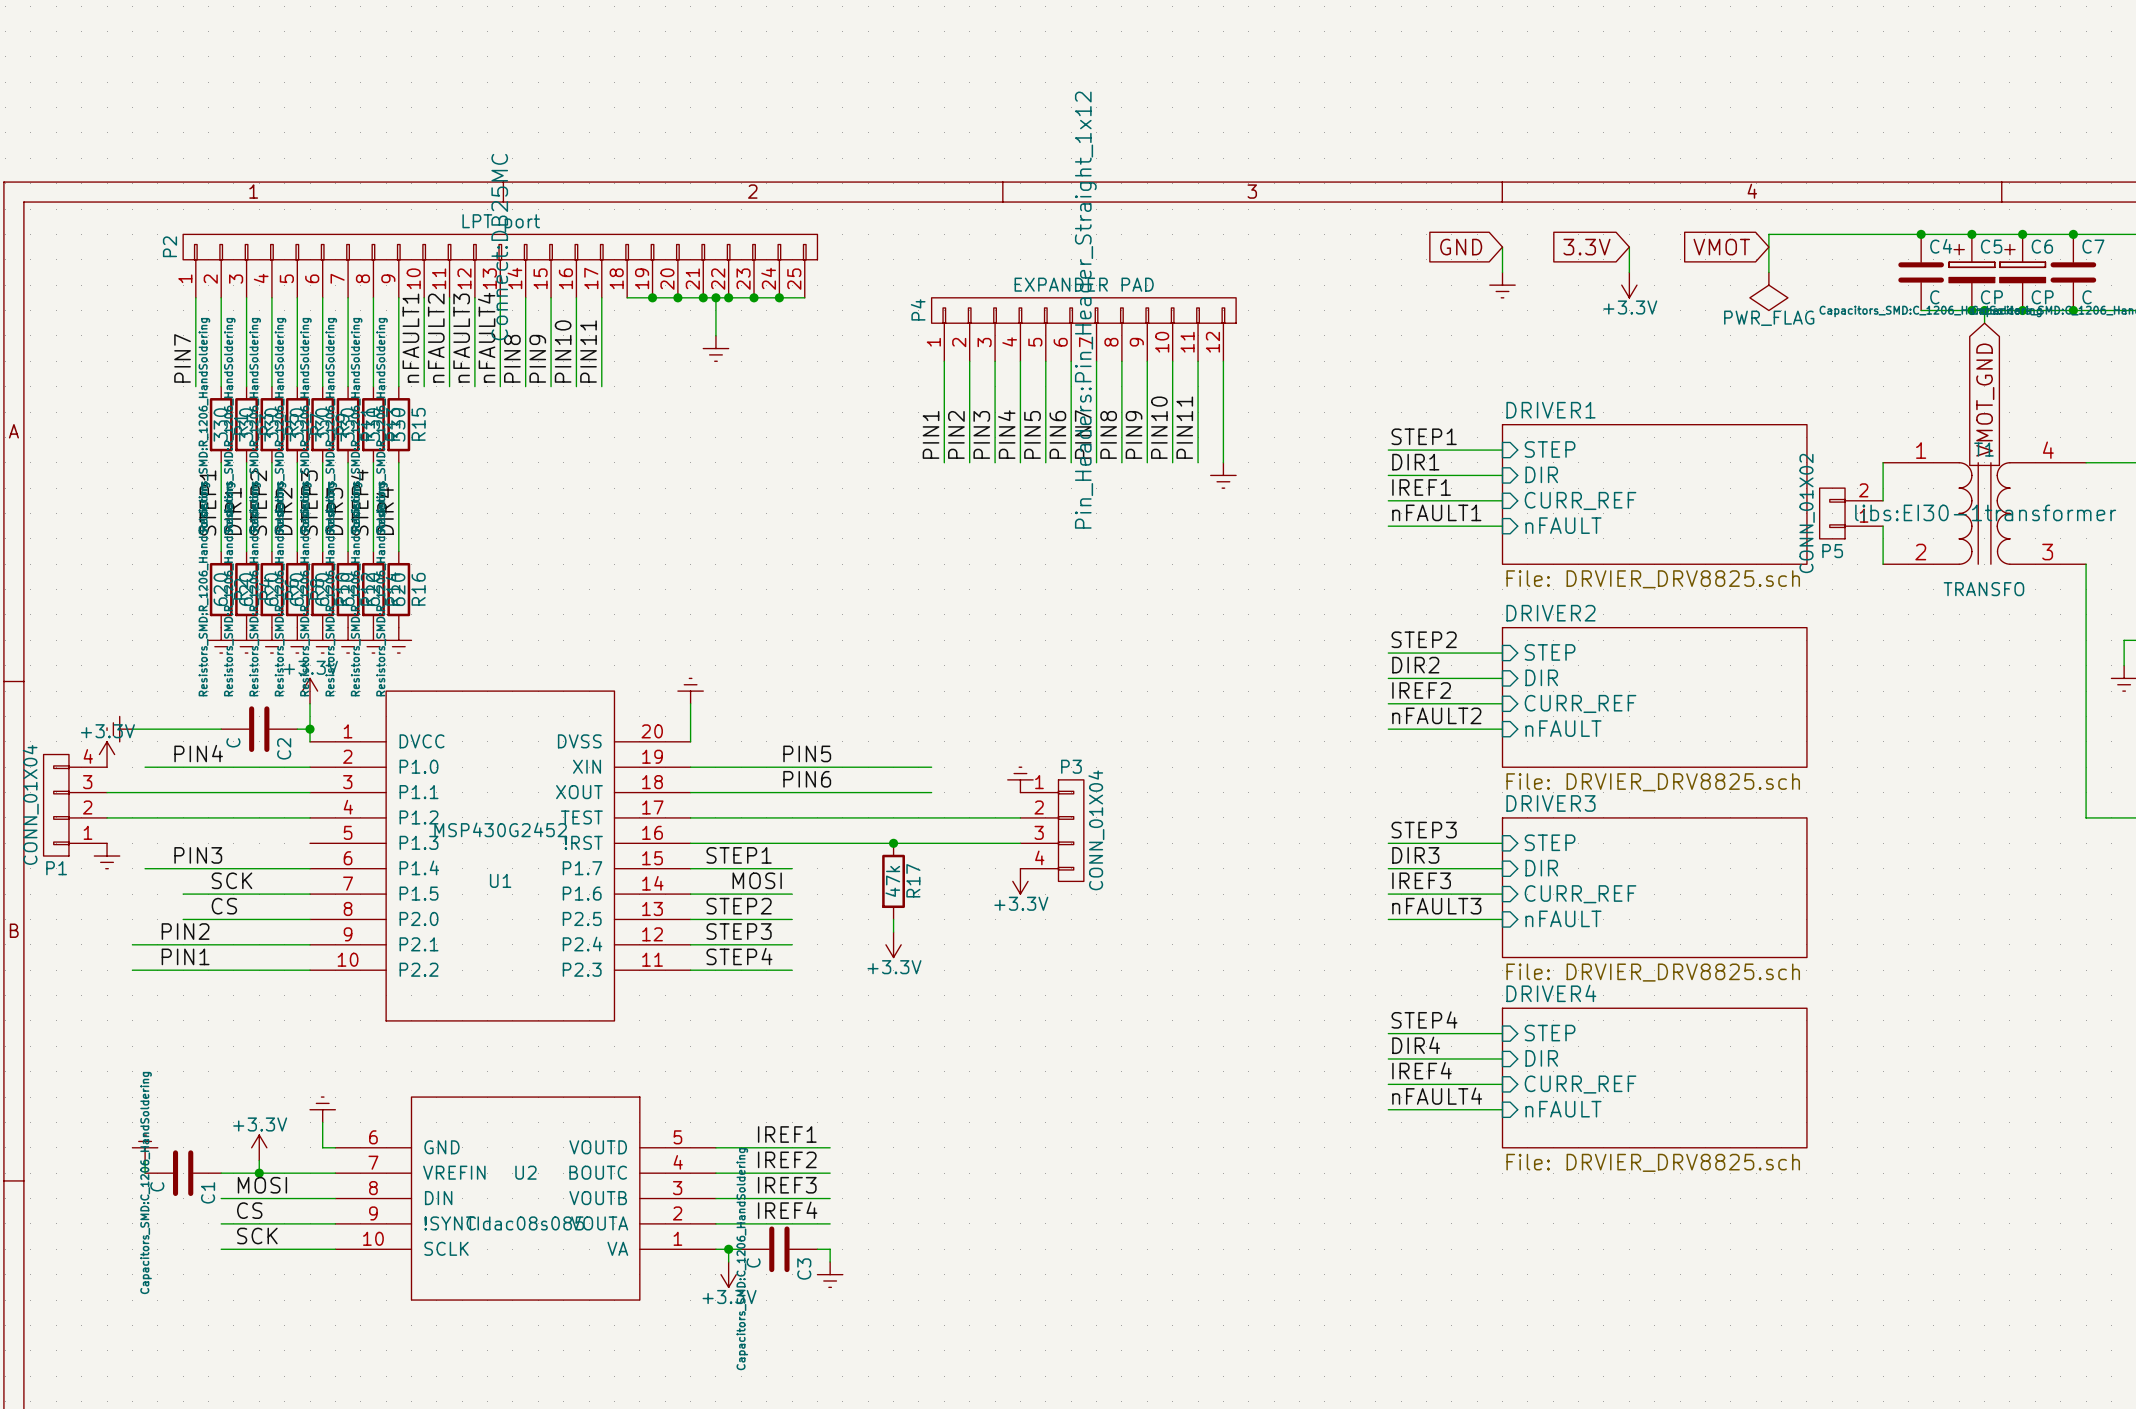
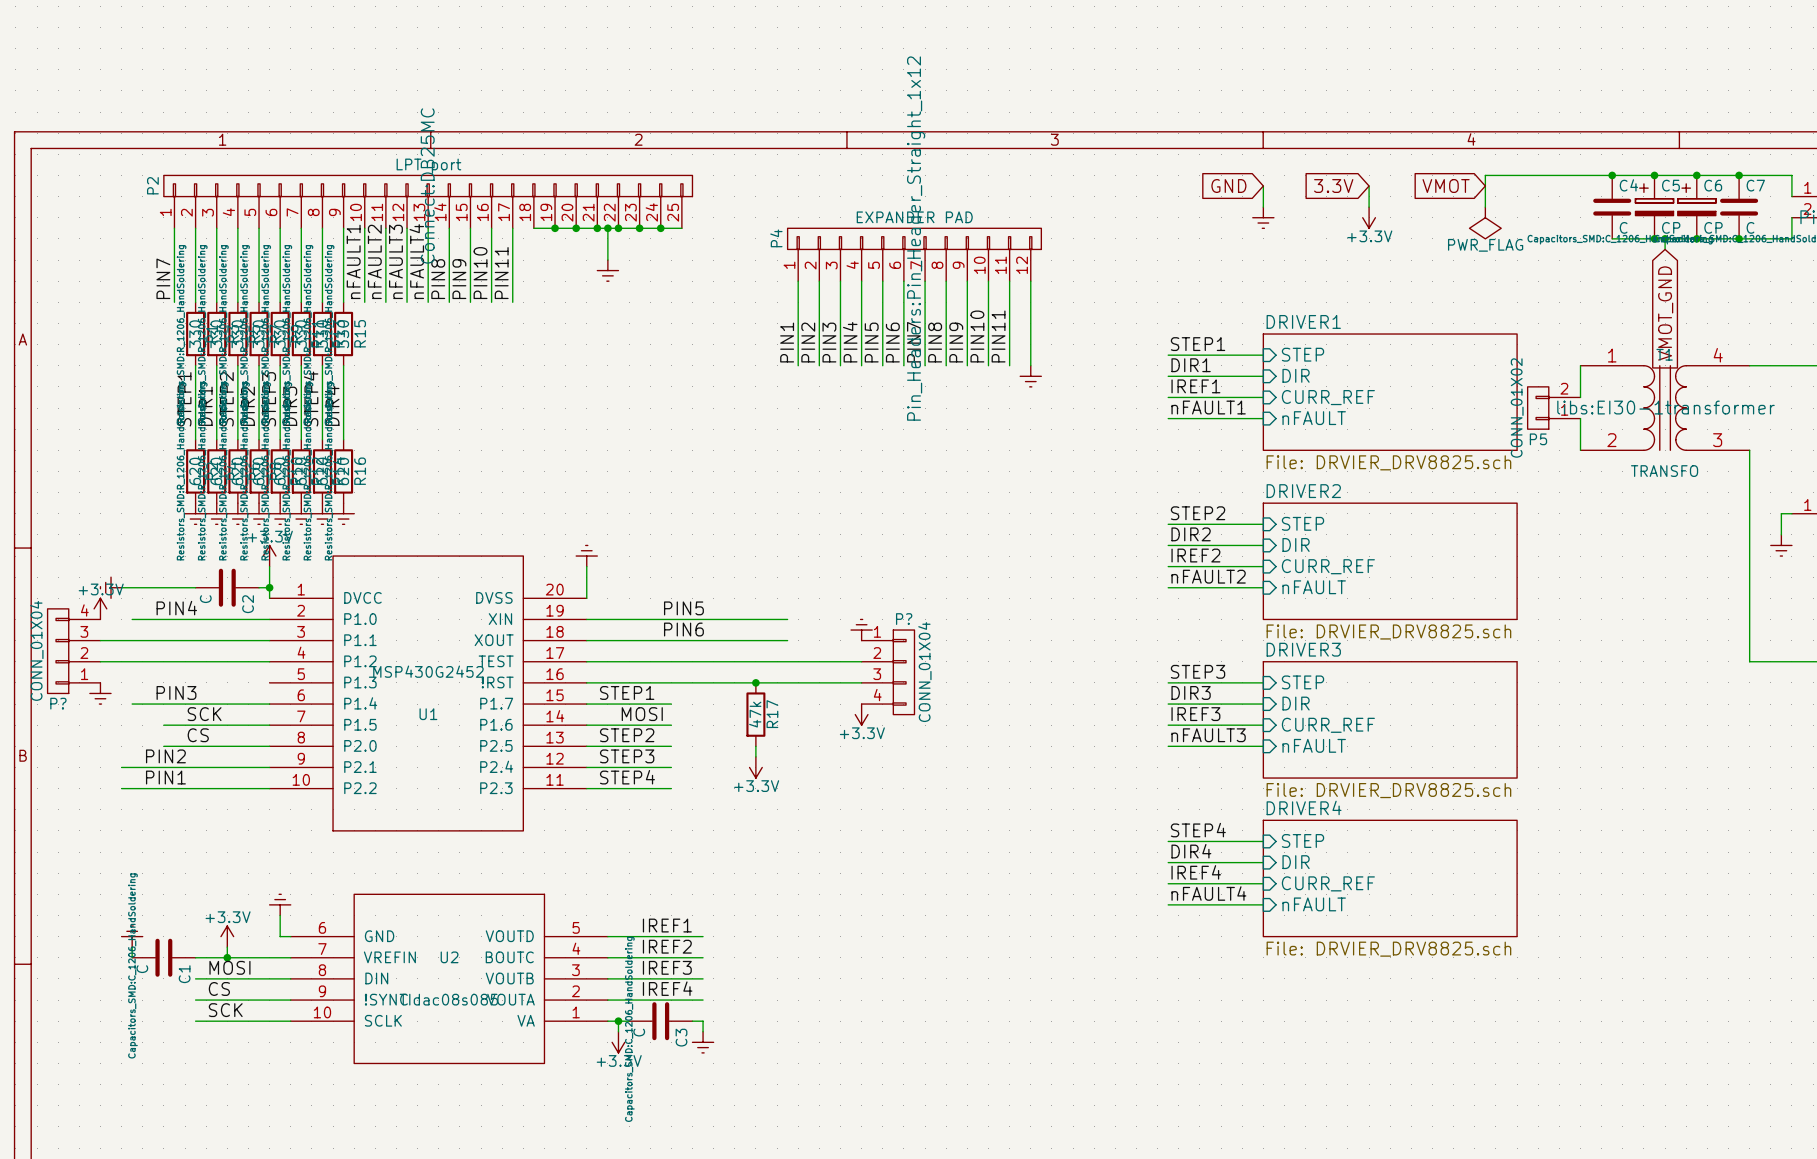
P3 name: P3 (1071, 766) -> P? (904, 619)
P1 name: P1 (56, 868) -> P? (58, 703)

